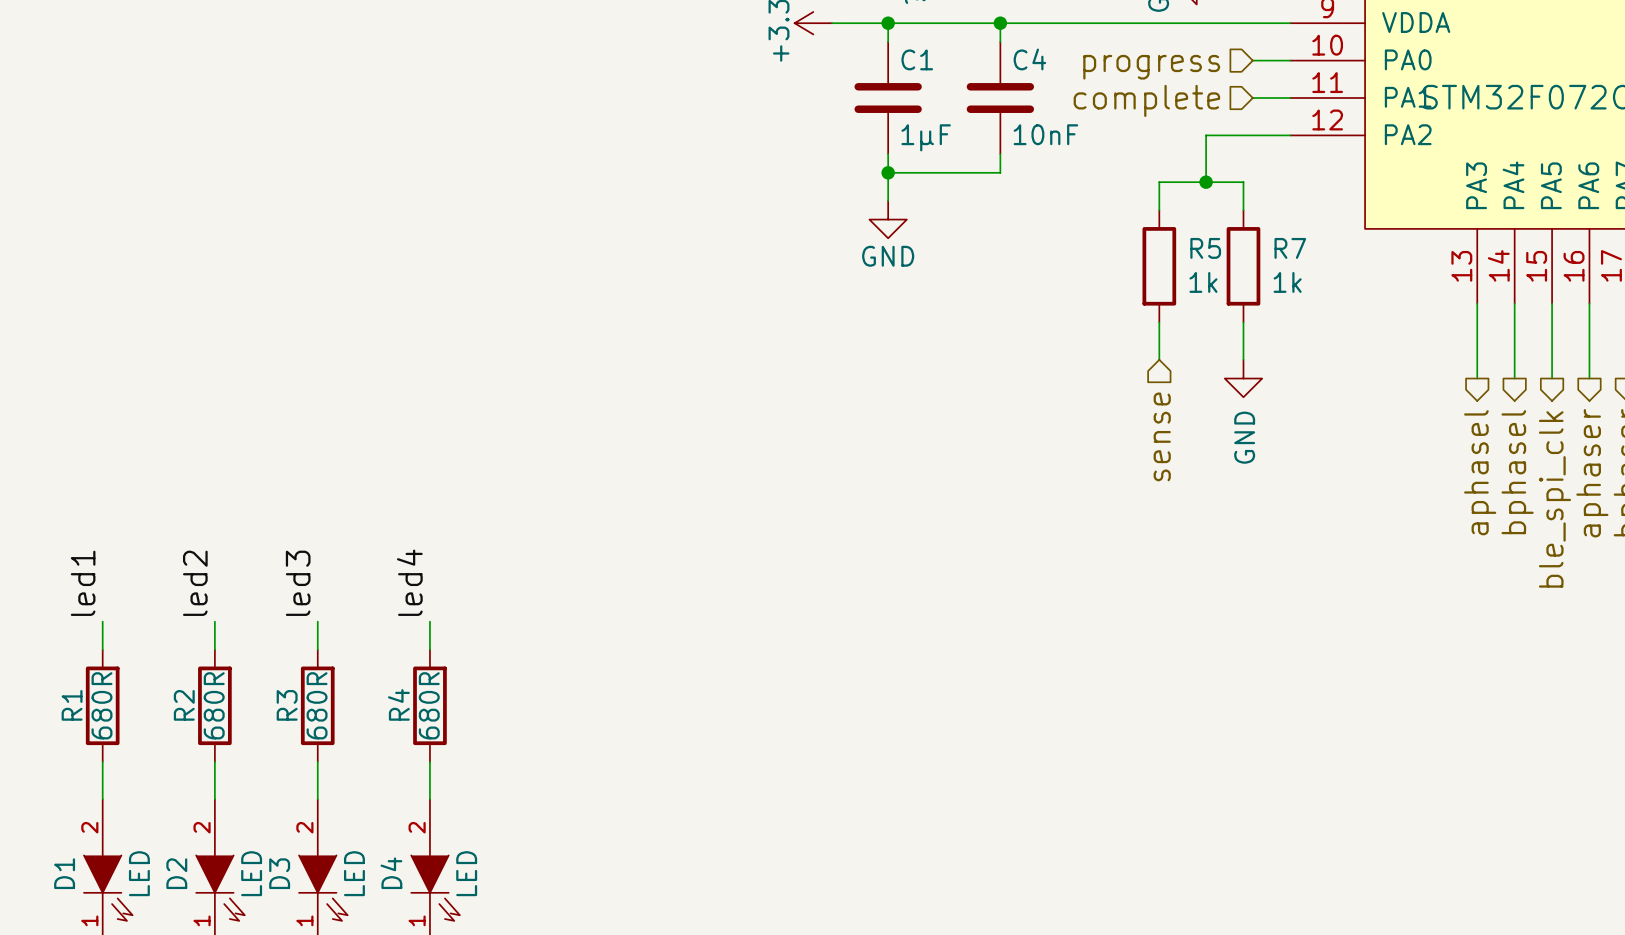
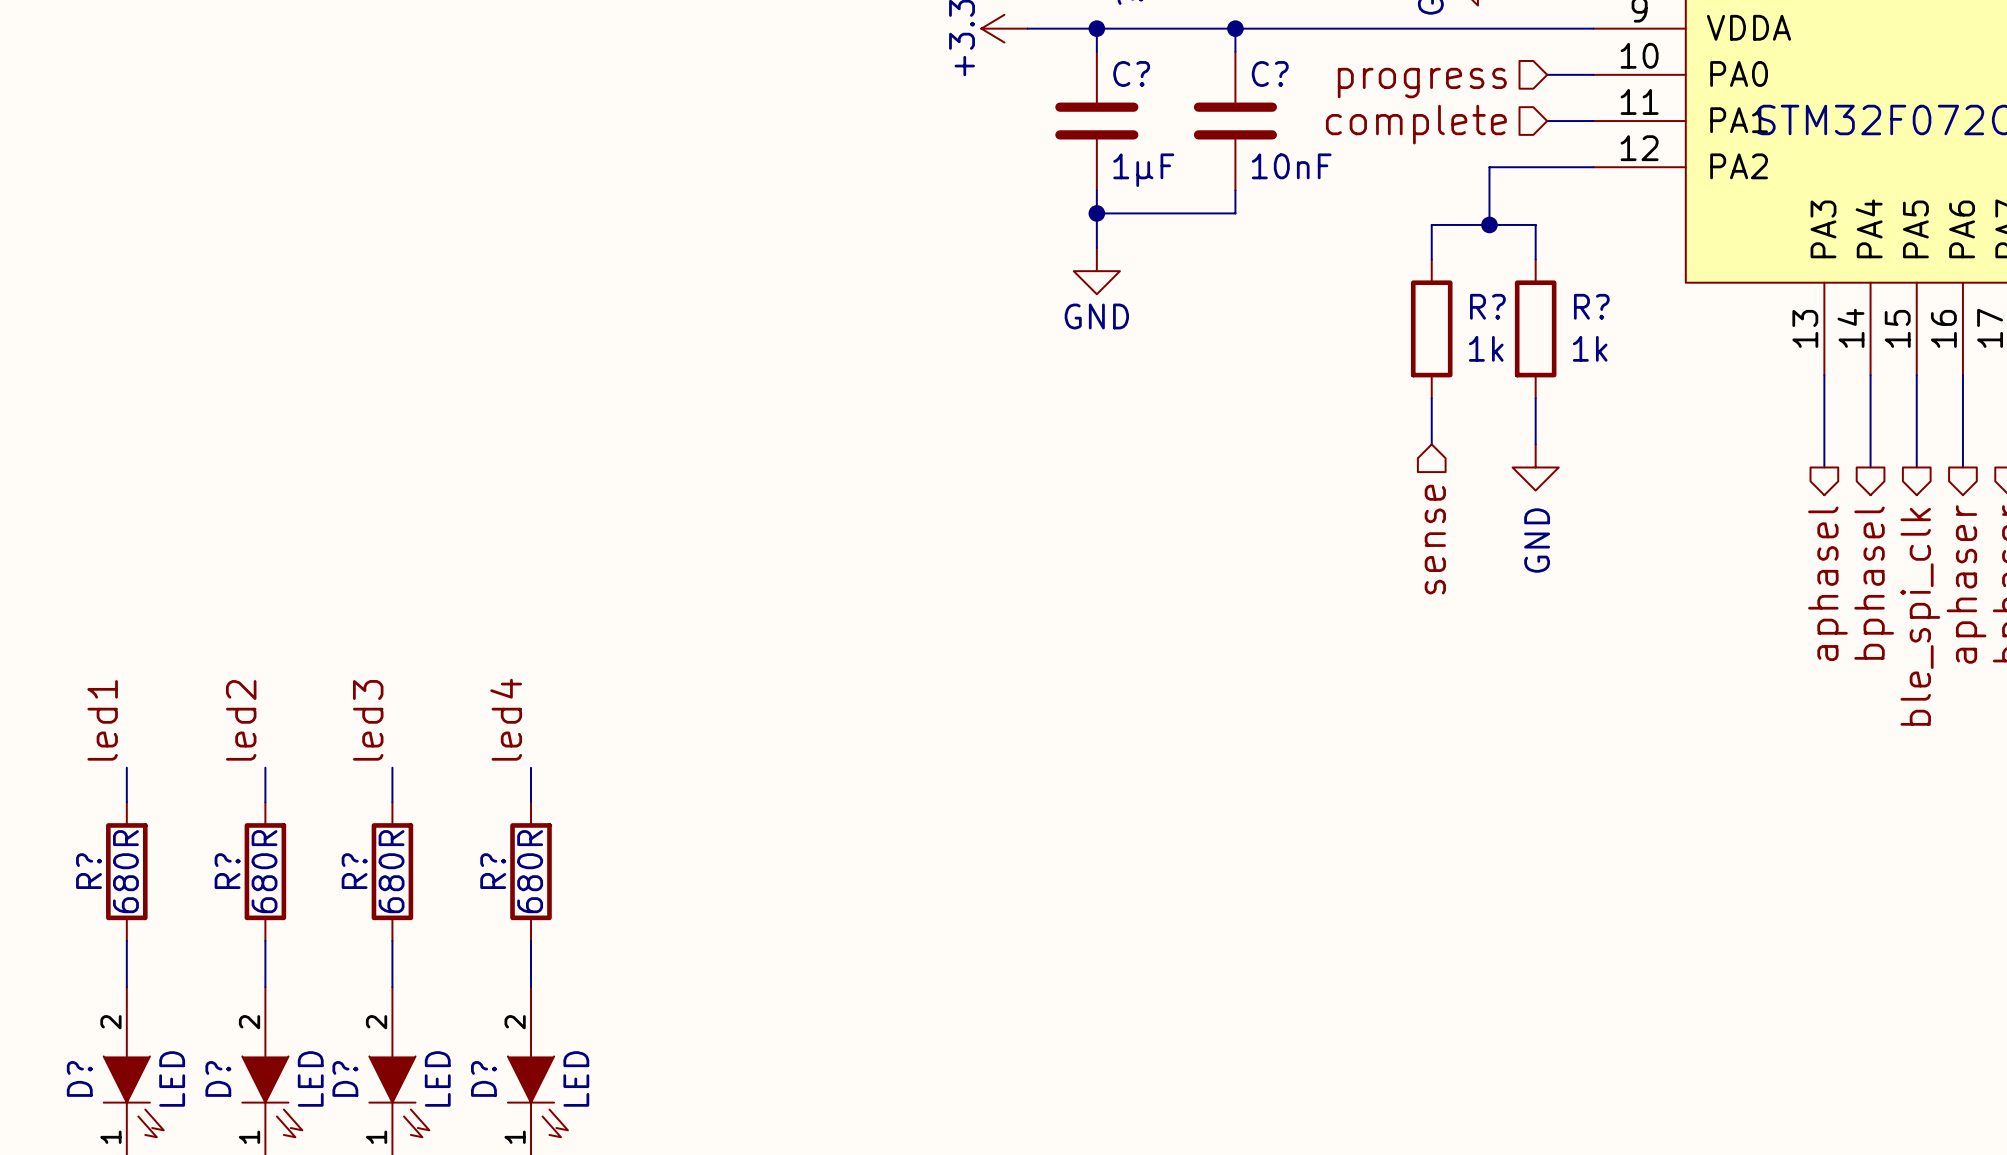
C1 name: C1 (917, 59) -> C? (1131, 73)
C4 name: C4 (1029, 59) -> C? (1270, 73)
R5 name: R5 (1205, 248) -> R? (1487, 306)
R7 name: R7 (1290, 248) -> R? (1591, 306)
R4 name: R4 (398, 704) -> R? (493, 871)
R1 name: R1 (72, 705) -> R? (89, 871)
R2 name: R2 (184, 705) -> R? (227, 871)
R3 name: R3 (287, 705) -> R? (354, 871)
D1 name: D1 (64, 873) -> D? (79, 1078)
D2 name: D2 (176, 873) -> D? (218, 1078)
D3 name: D3 (279, 873) -> D? (345, 1078)
D4 name: D4 (391, 873) -> D? (483, 1078)

